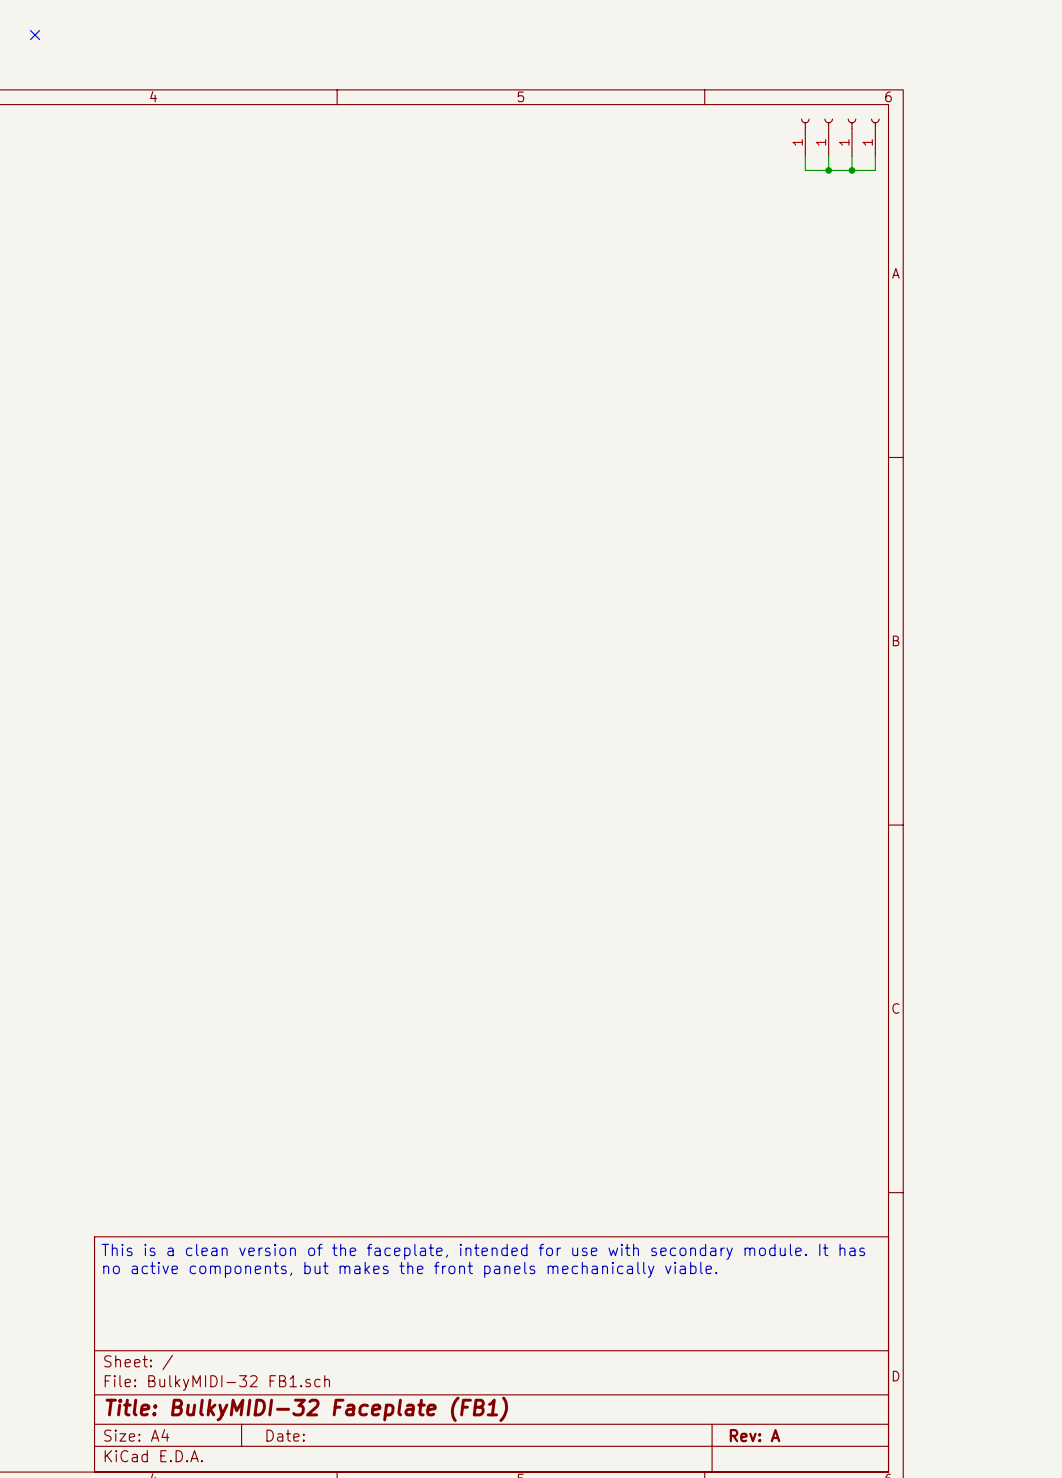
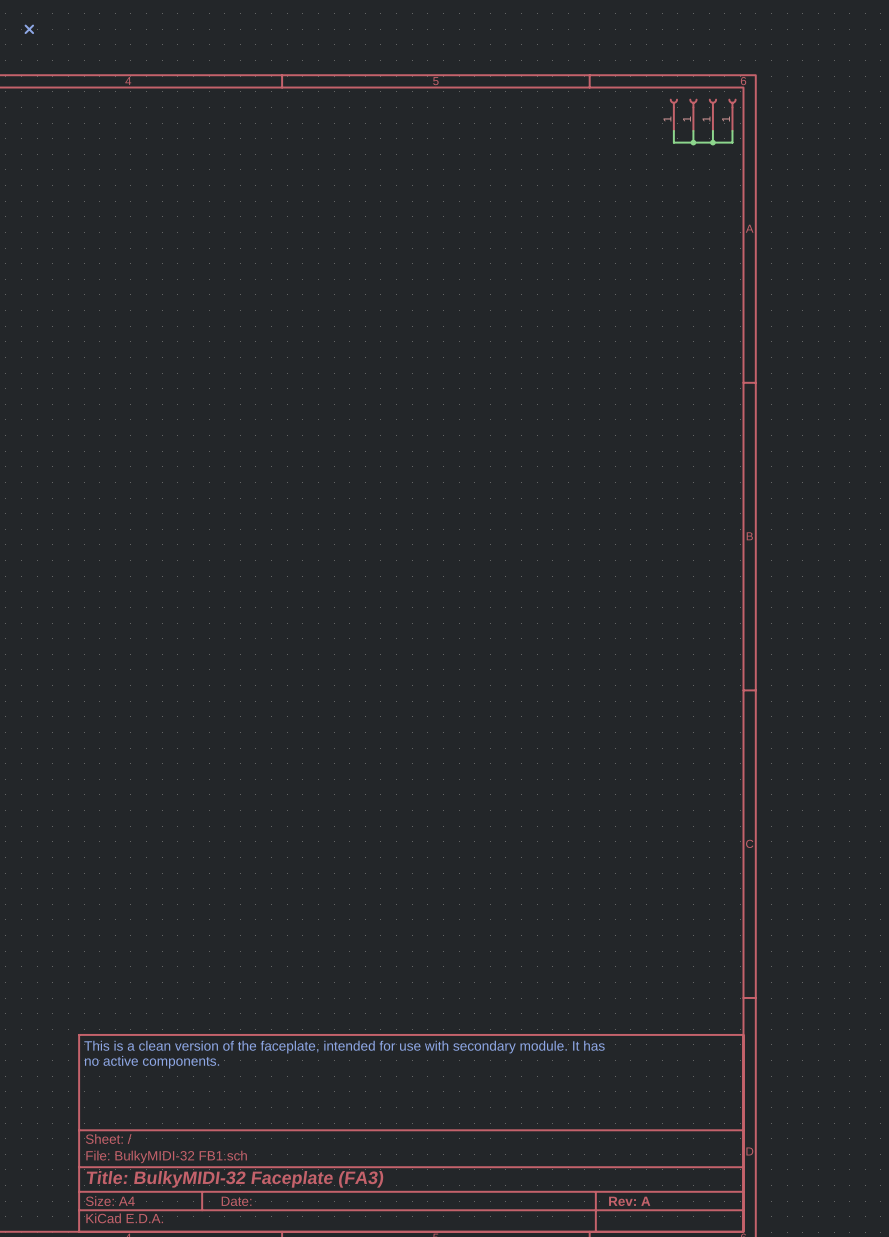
text: no active components, but makes the front panels mechanically viable. (410, 1269) -> no active components. (152, 1062)
title block: Title: BulkyMIDI-32 Faceplate (FB1) (306, 1409) -> Title: BulkyMIDI-32 Faceplate (FA3) (235, 1179)

